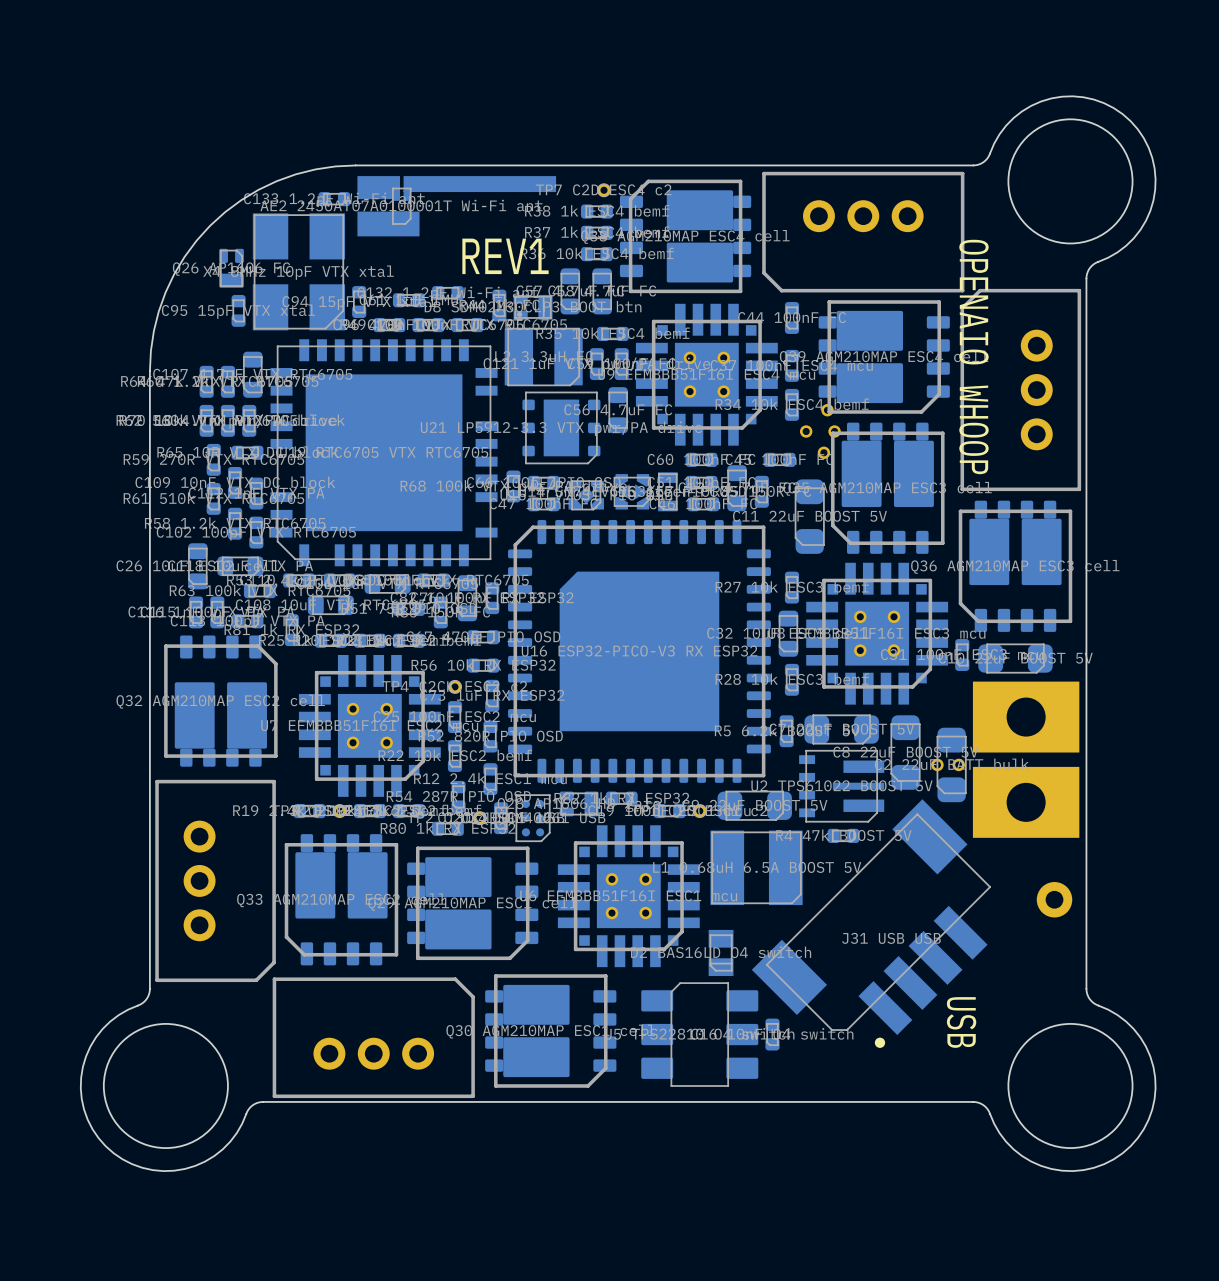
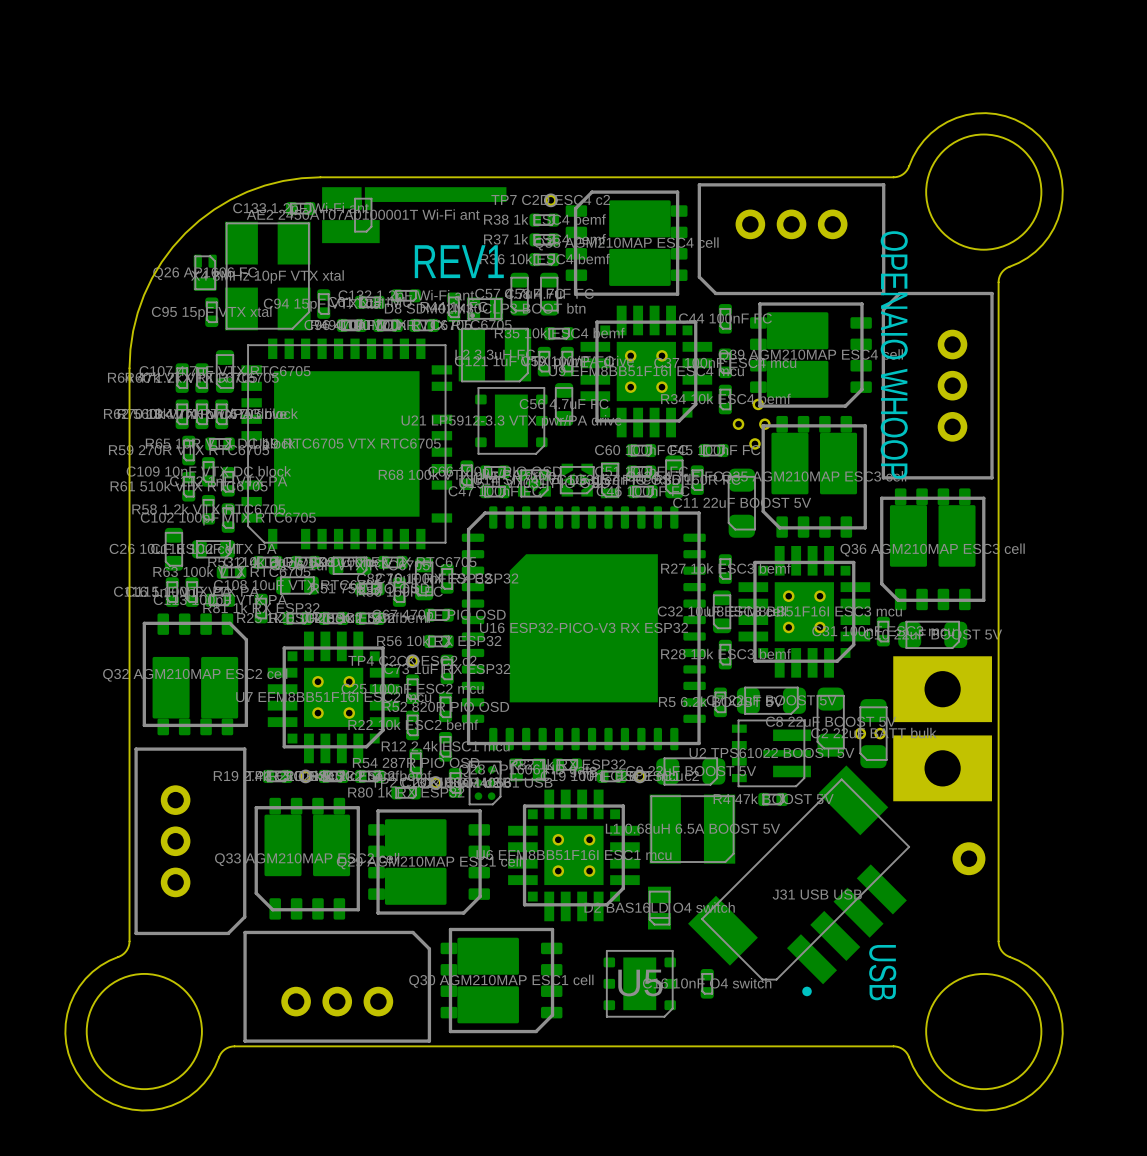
part: (699, 1034) -> none
U5: none -> (639, 983)

